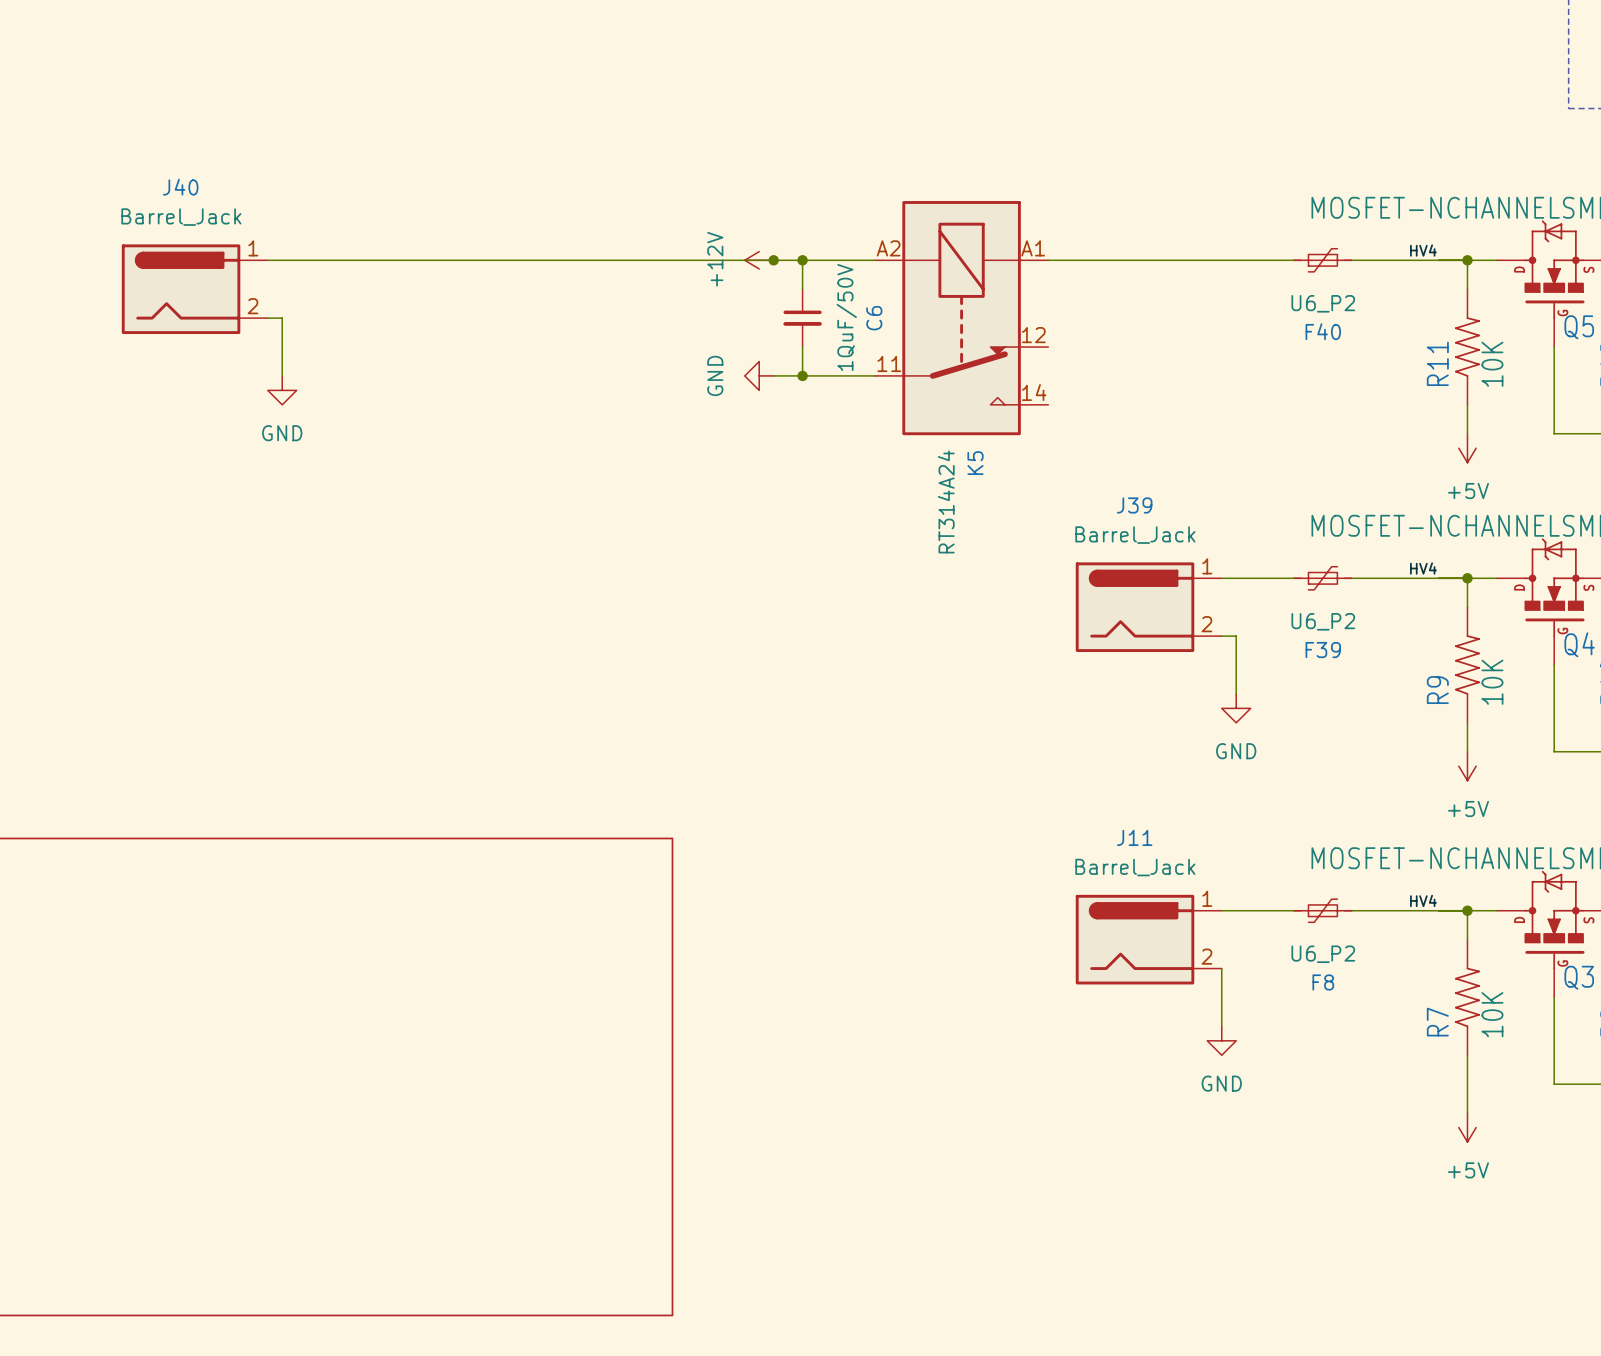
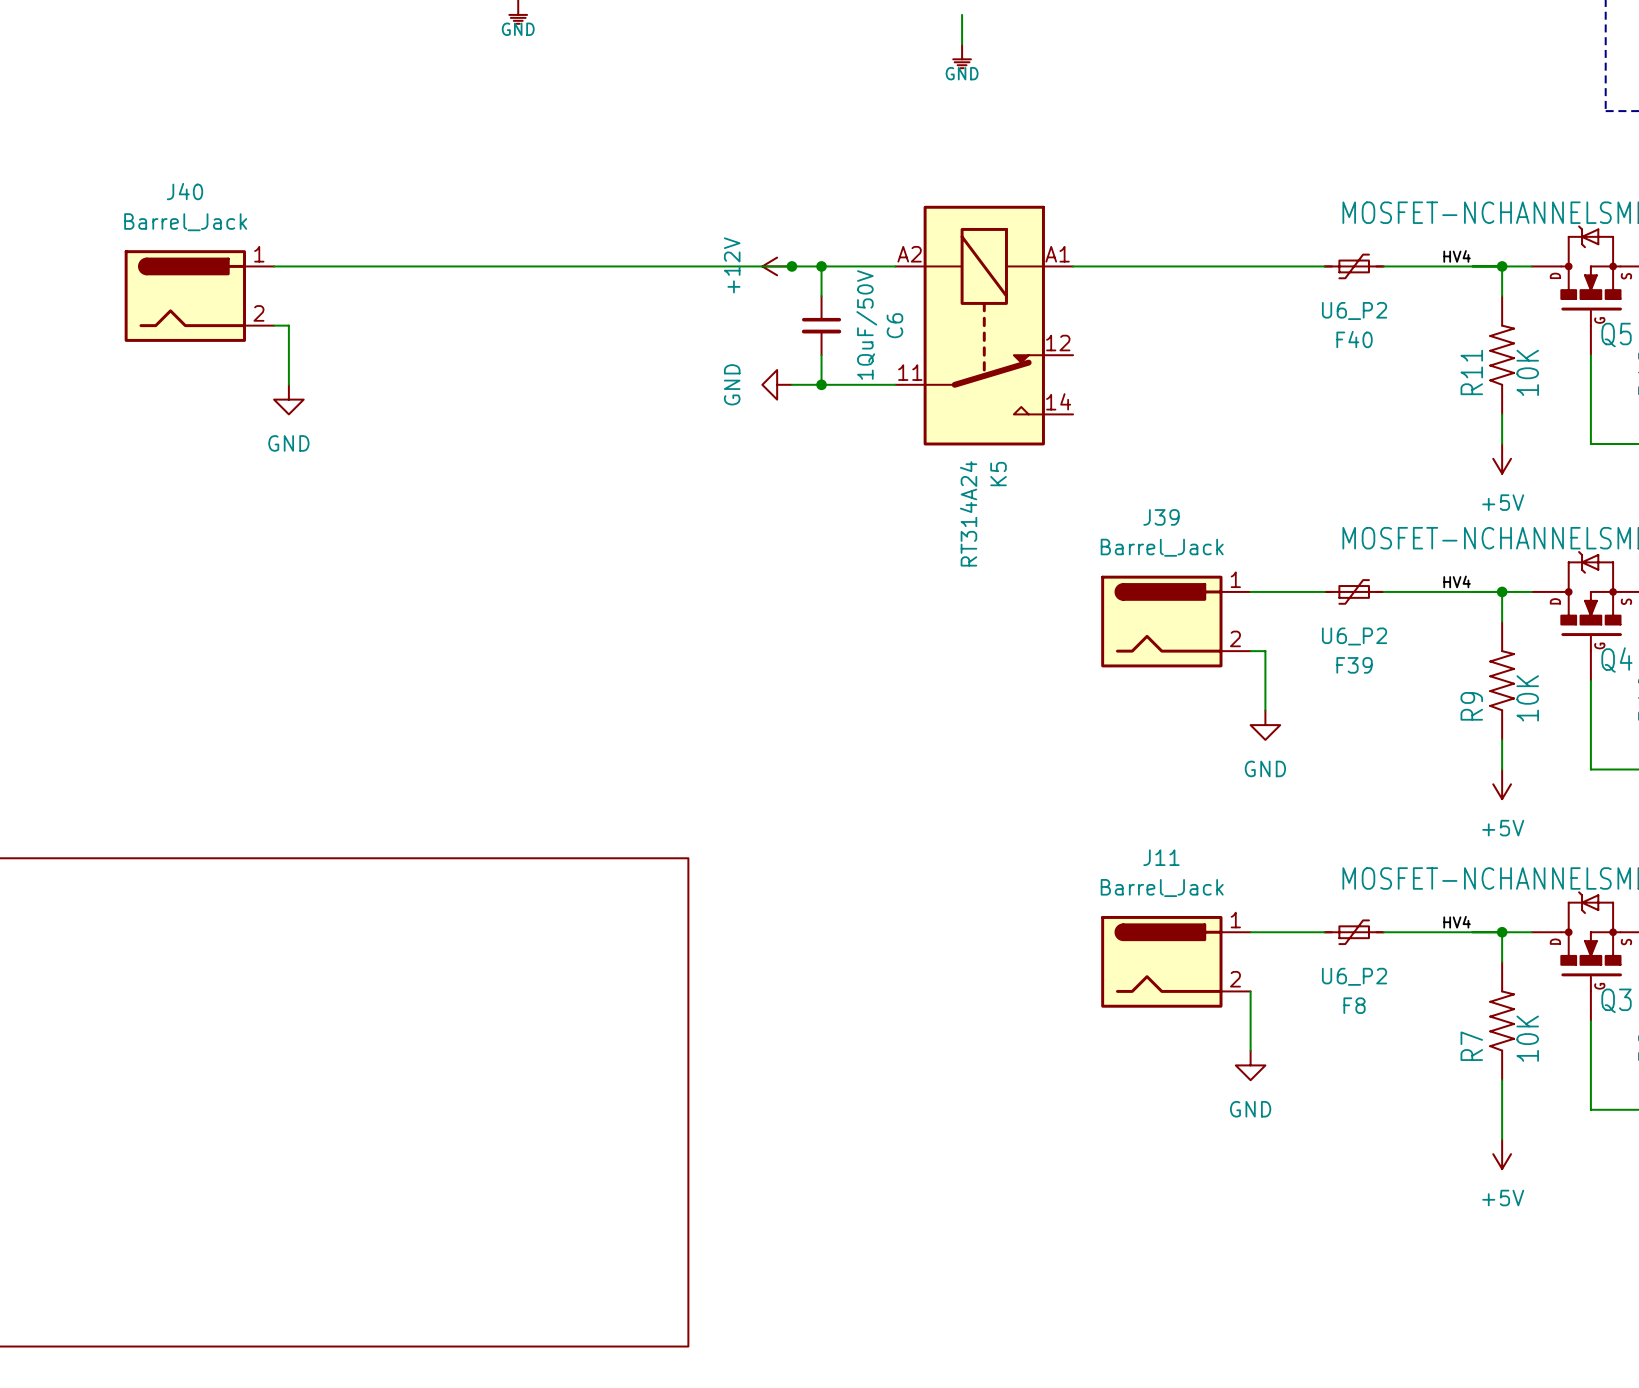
power symbol: none -> GND (518, 11)
wire: none -> (962, 14) (962, 44)
power symbol: none -> GND (962, 56)

